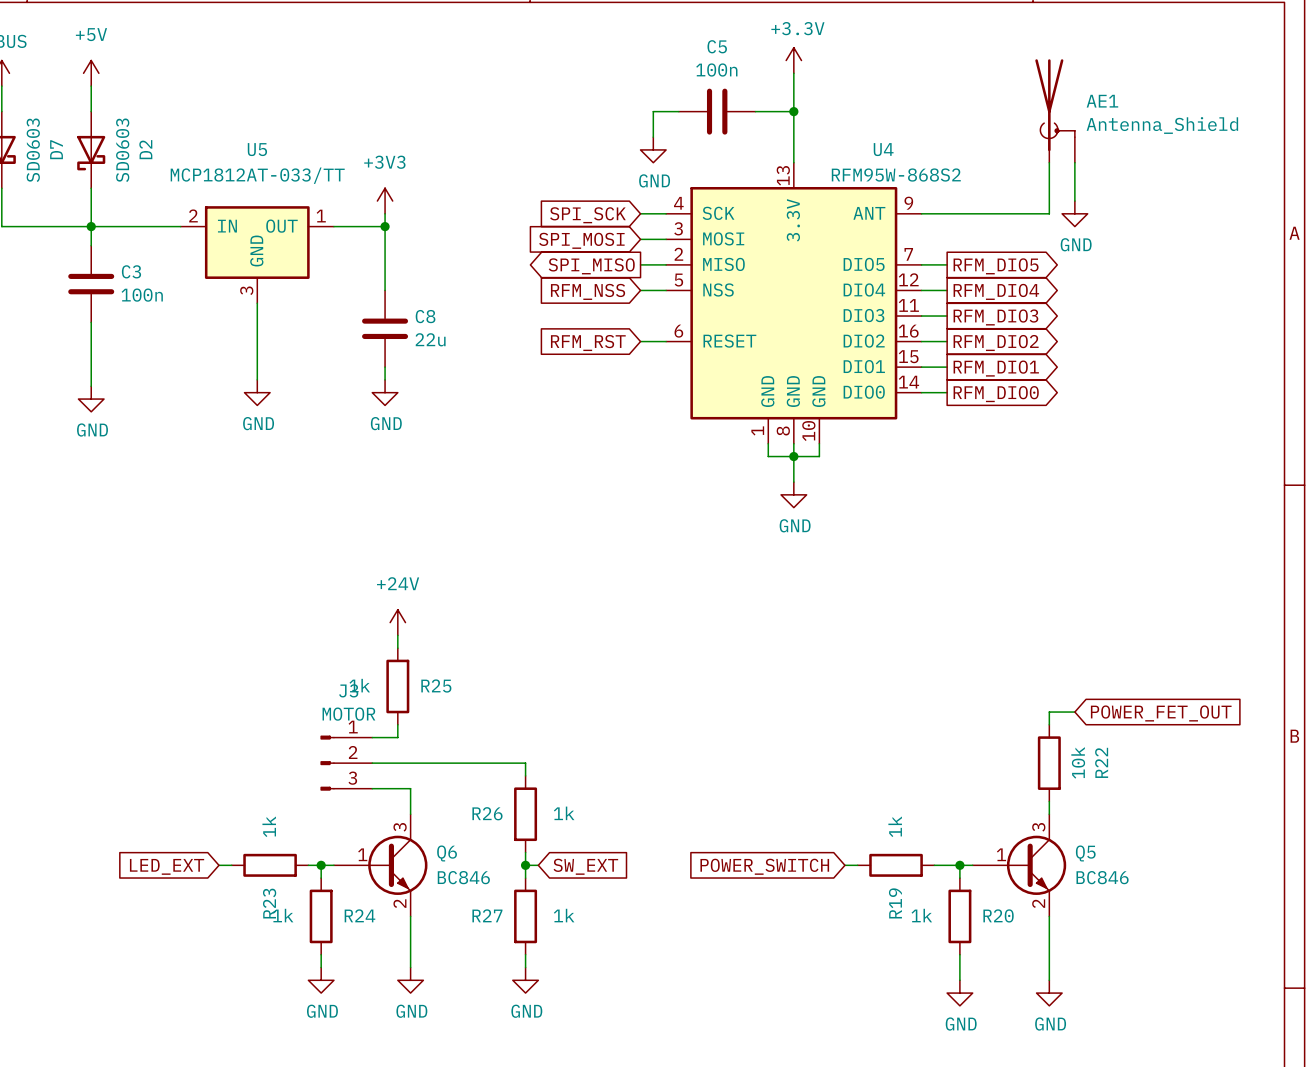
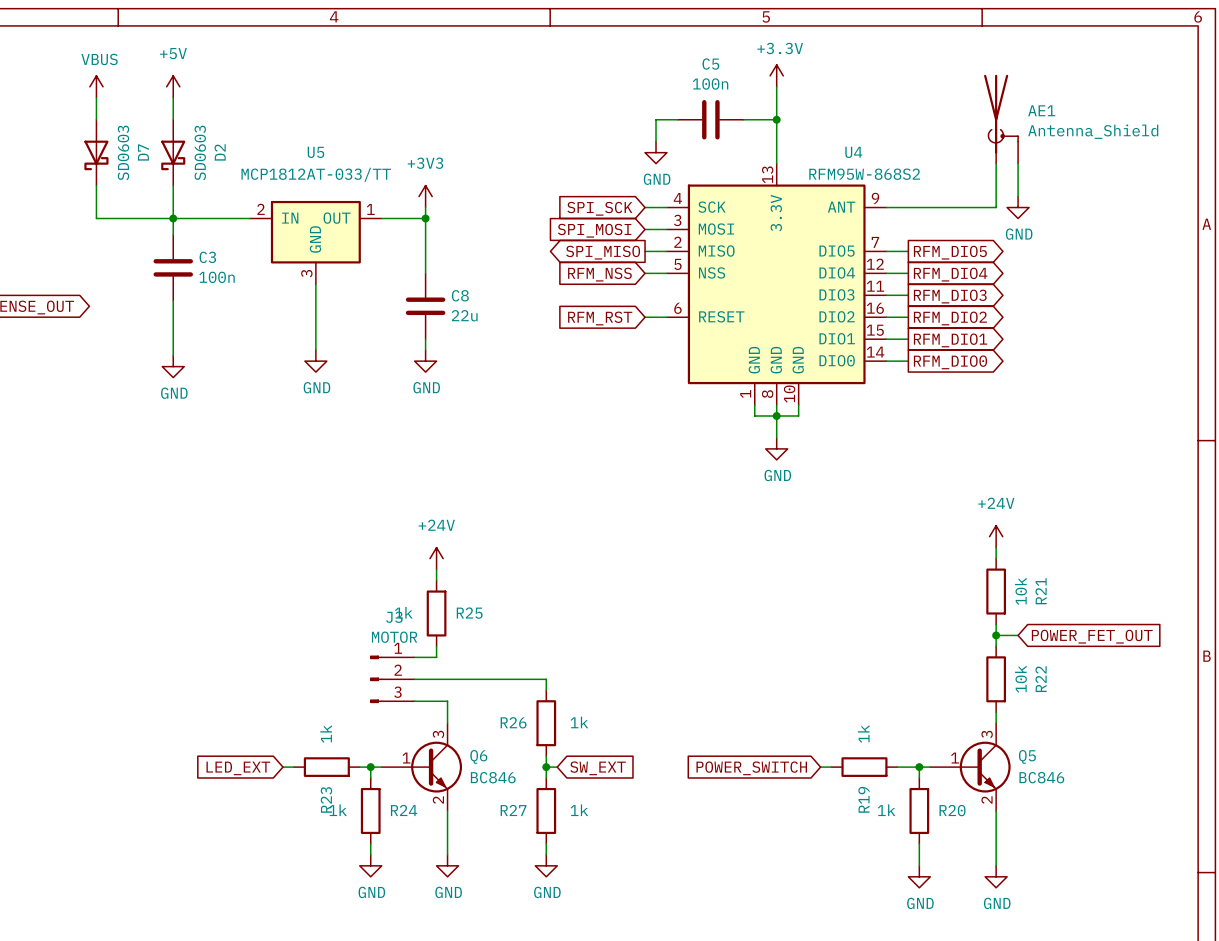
power symbol: none -> +24V (996, 536)
wire: none -> (996, 547) (996, 558)
R21: none -> 10k (996, 591)
wire: none -> (996, 624) (996, 635)
junction: none -> (996, 635)

